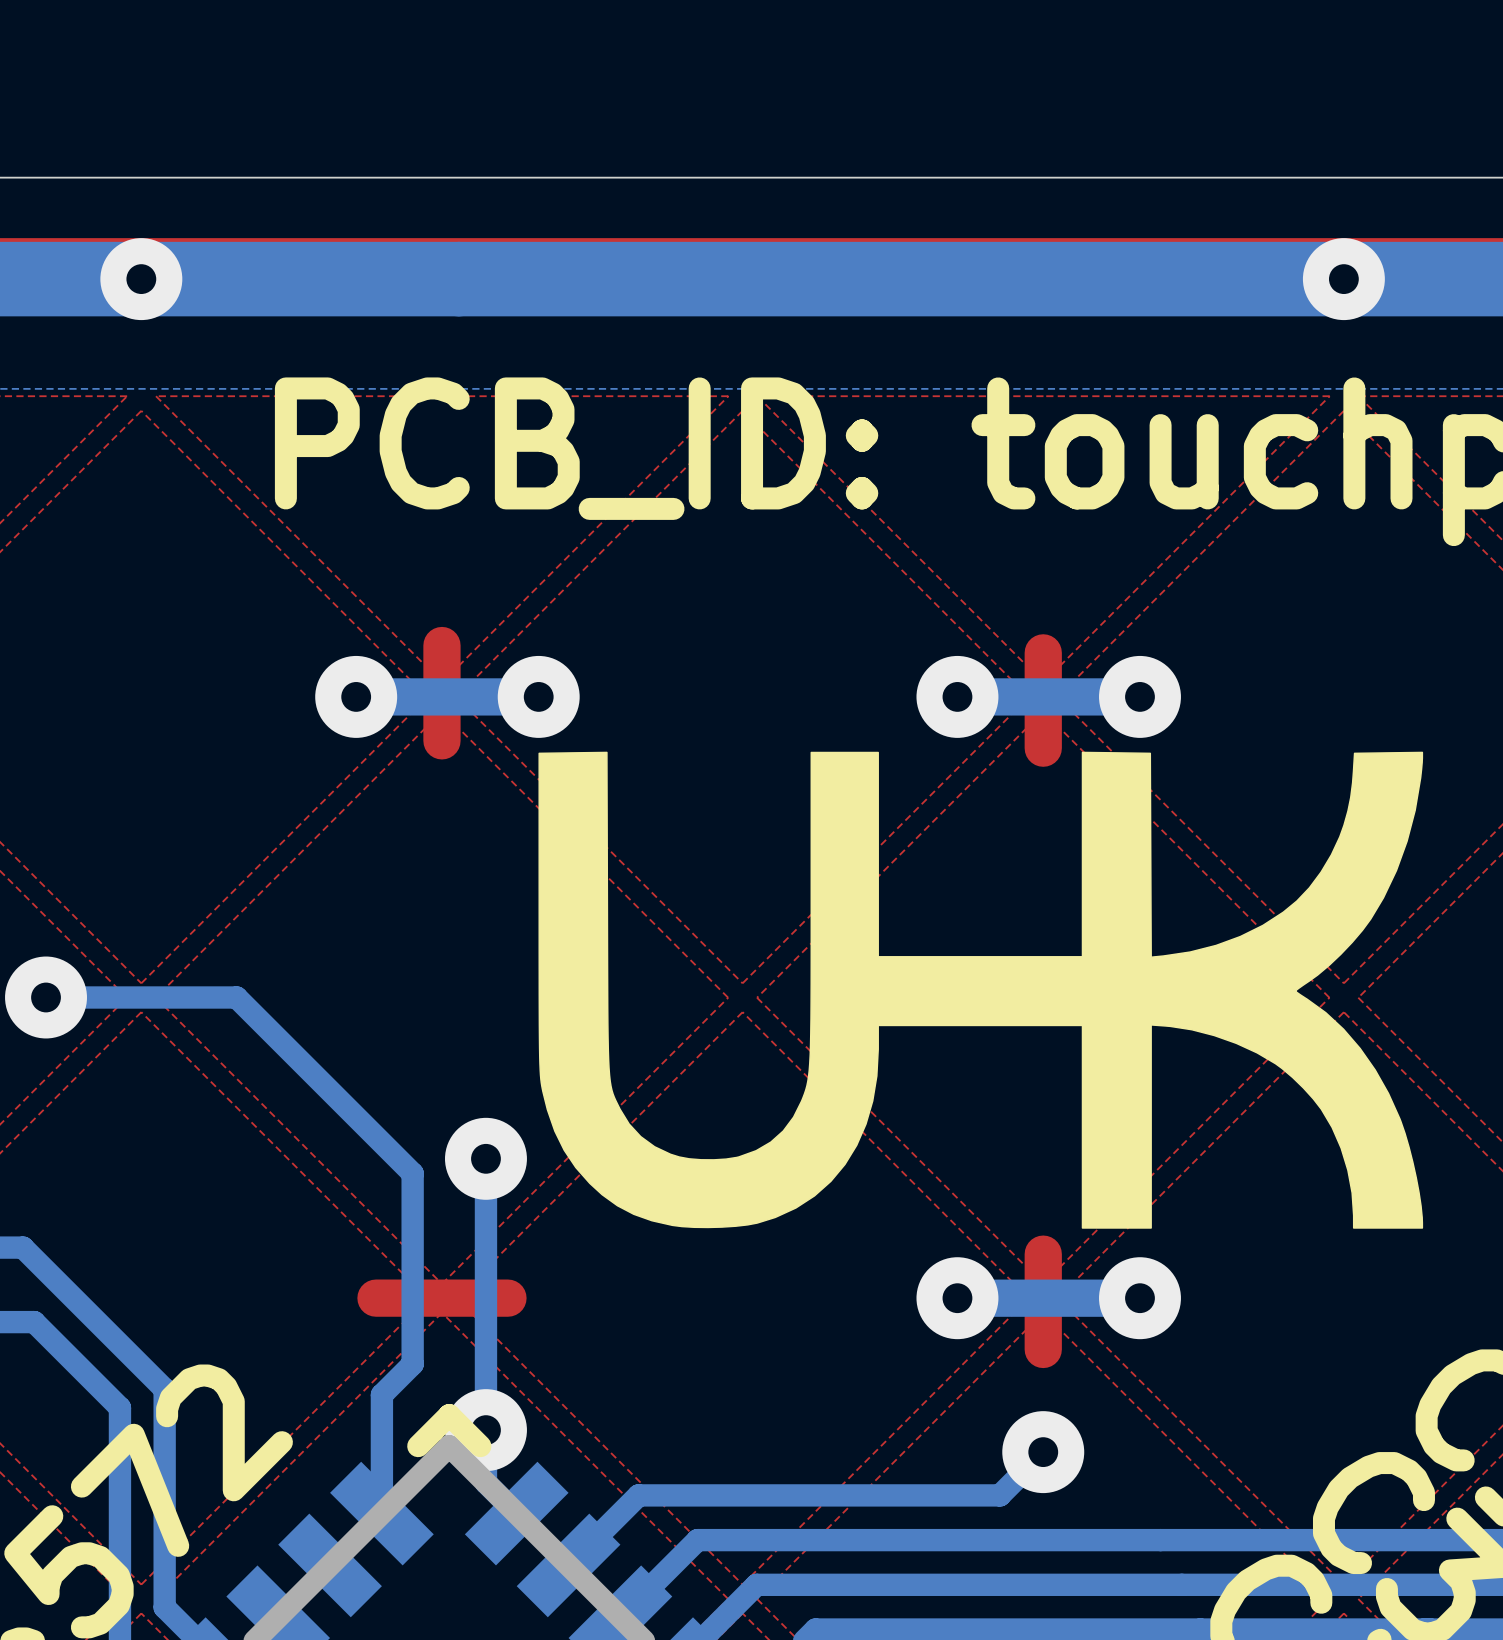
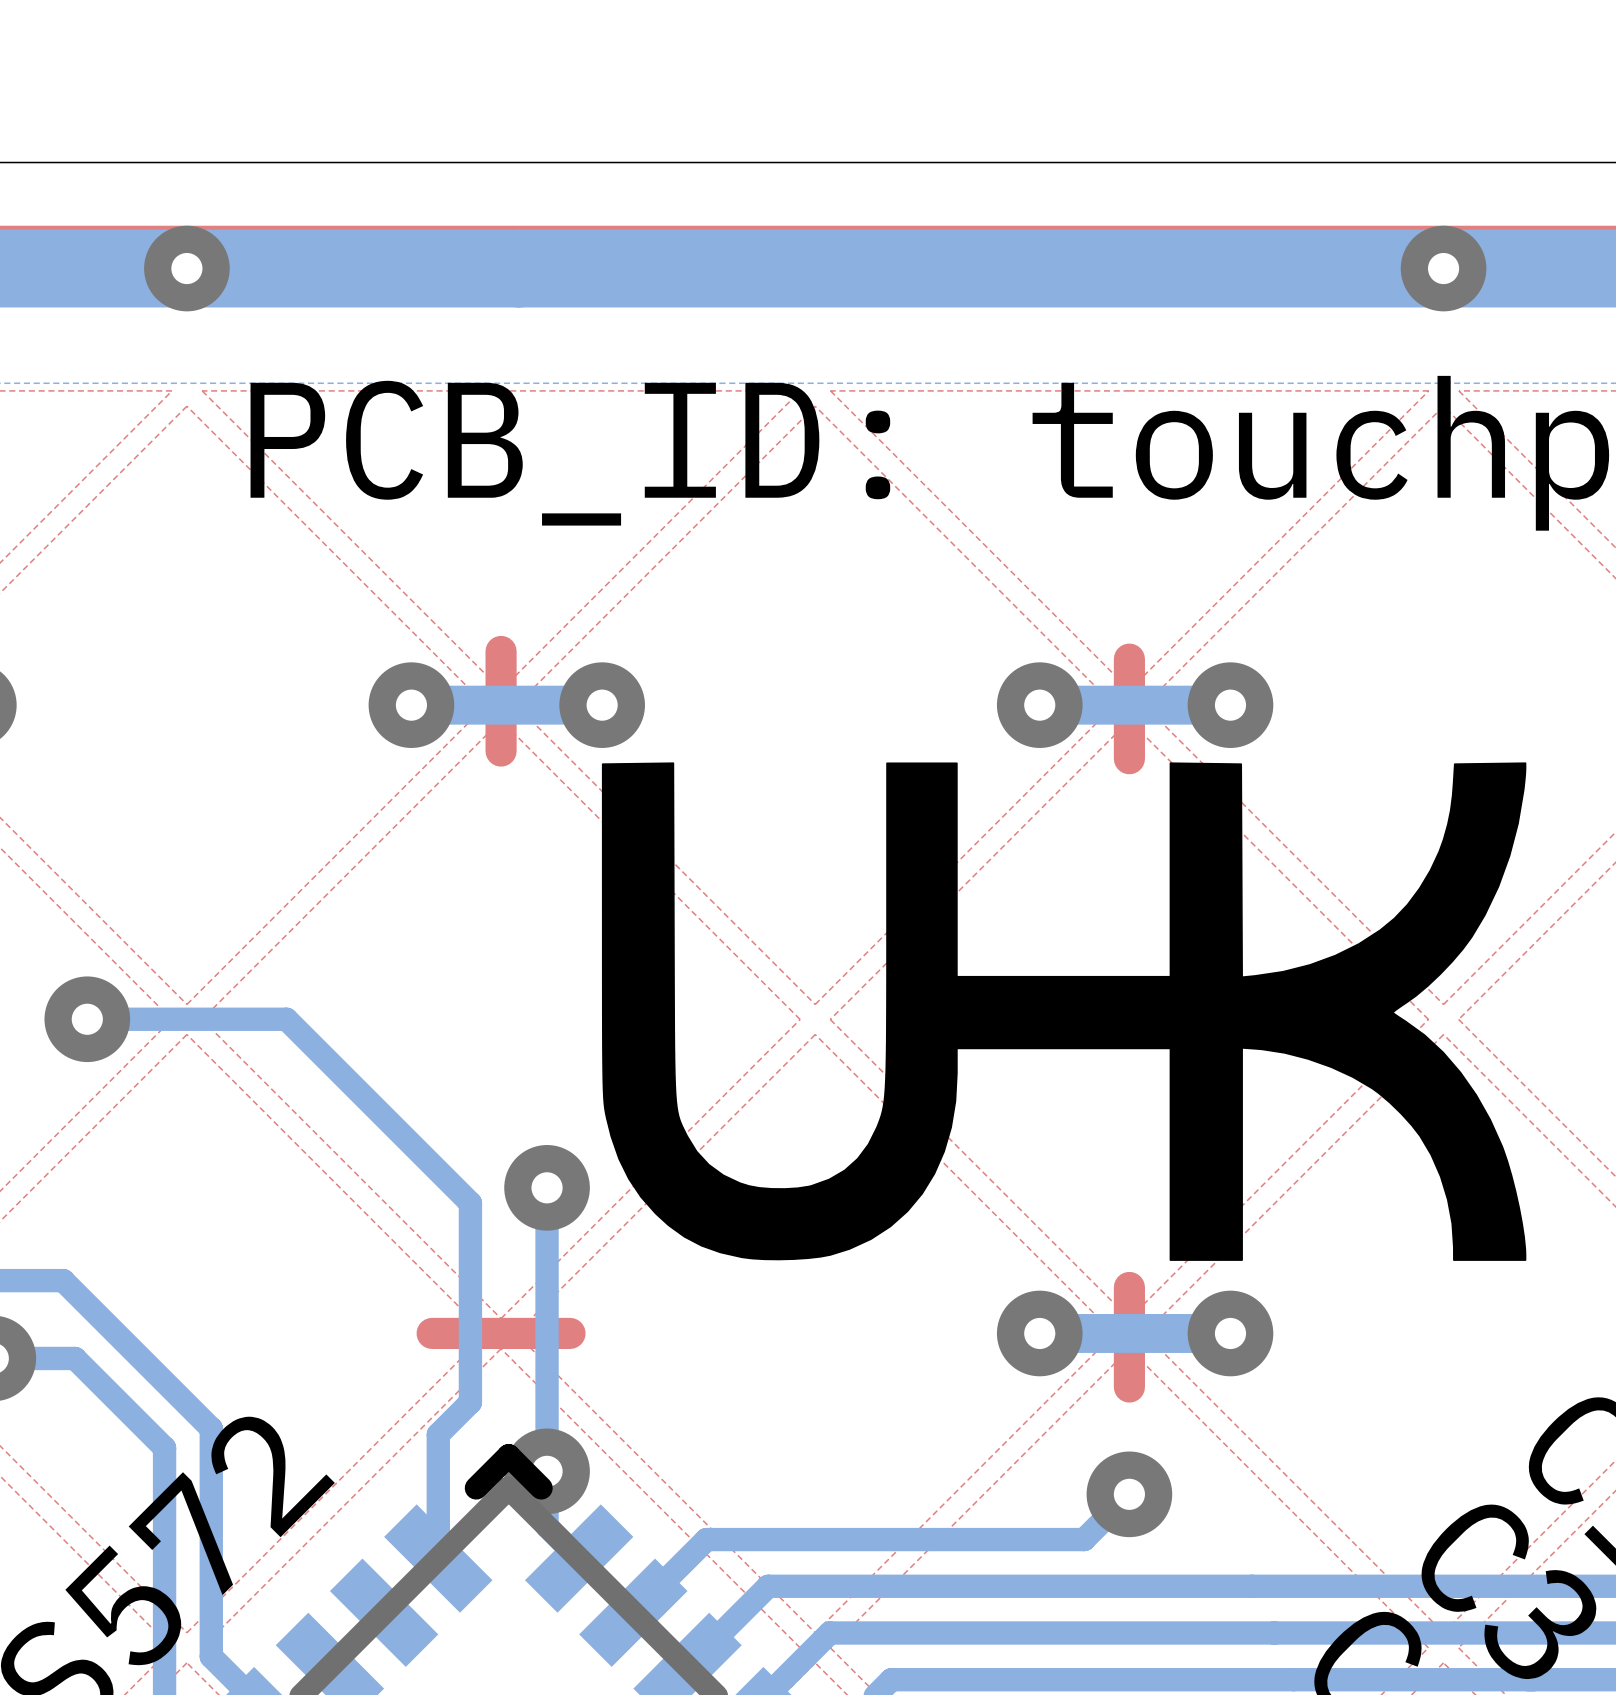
top track width: thick (441, 645) (441, 740) -> thin (501, 651) (501, 751)
top track width: thick (1043, 652) (1043, 748) -> thin (1129, 659) (1129, 758)
top track width: thick (1043, 1254) (1043, 1349) -> thin (1129, 1287) (1129, 1387)
top track width: thick (507, 1298) (375, 1298) -> thin (570, 1333) (432, 1333)

